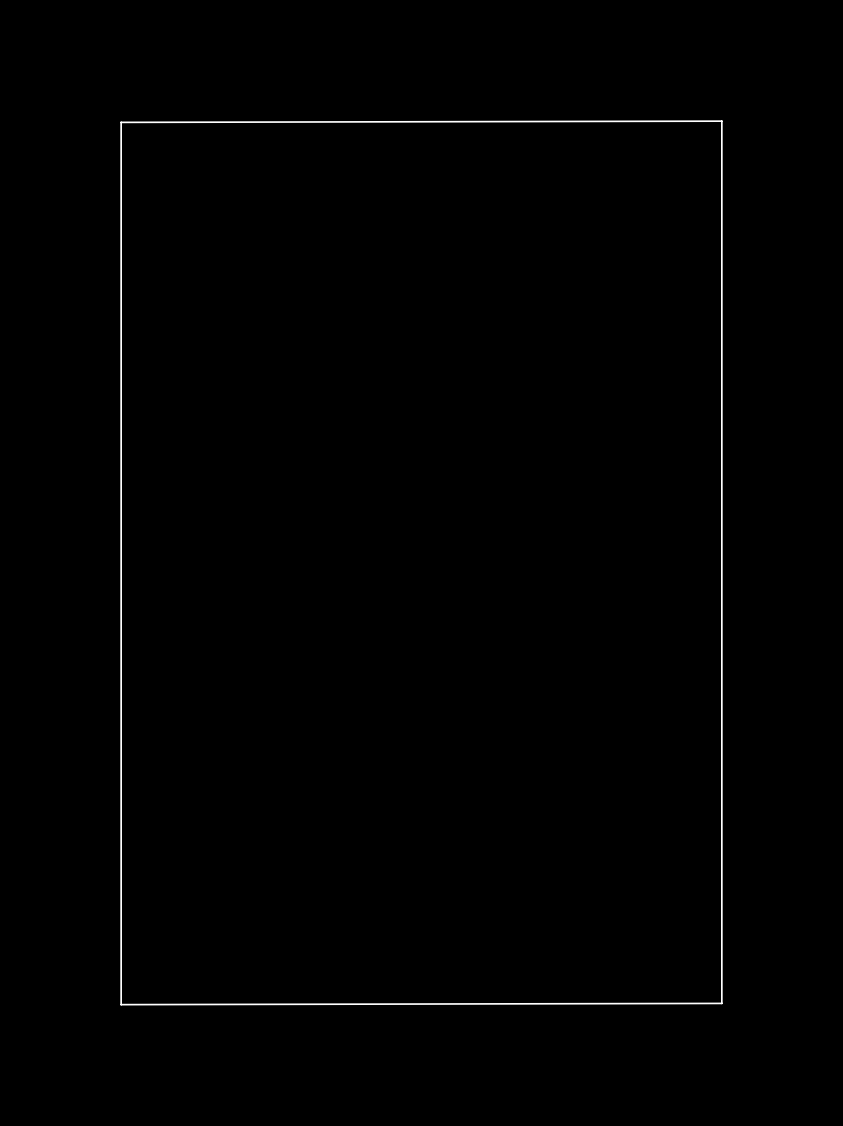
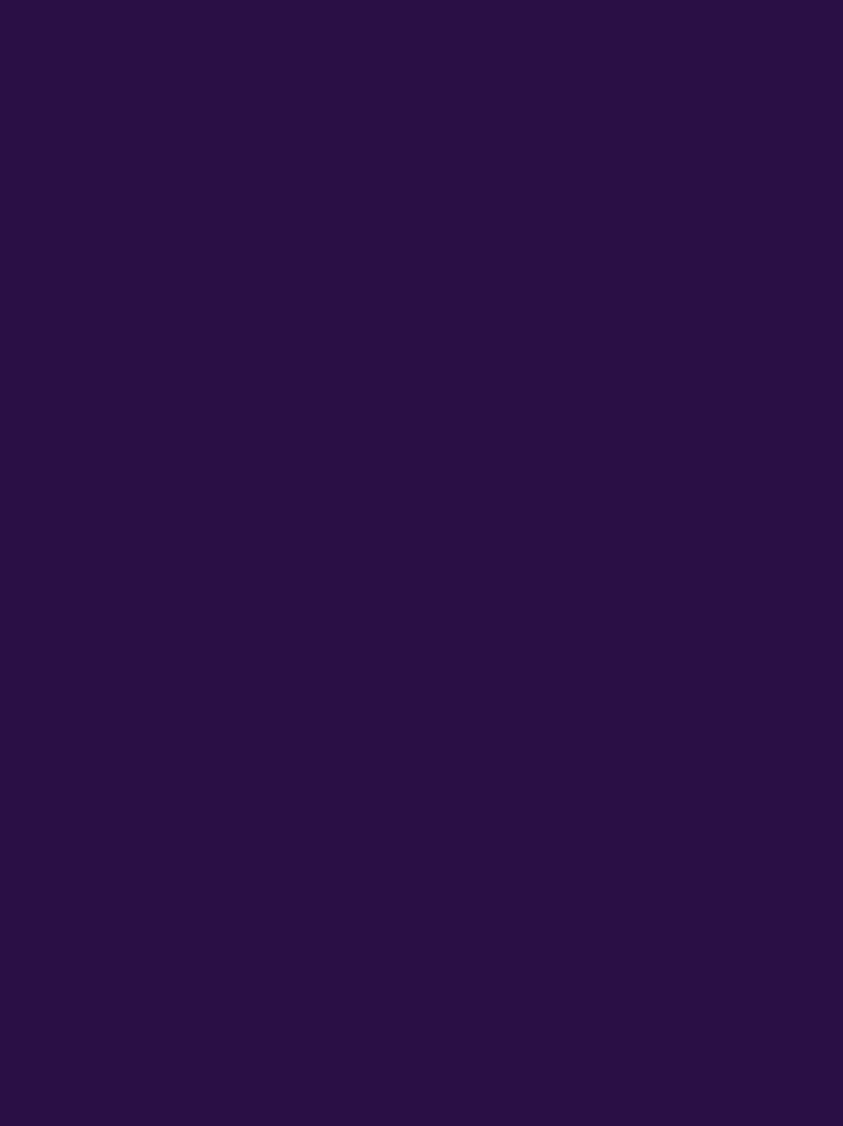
board edge: (721, 121) (121, 122) (121, 1004) (721, 1003) (721, 121) -> none

